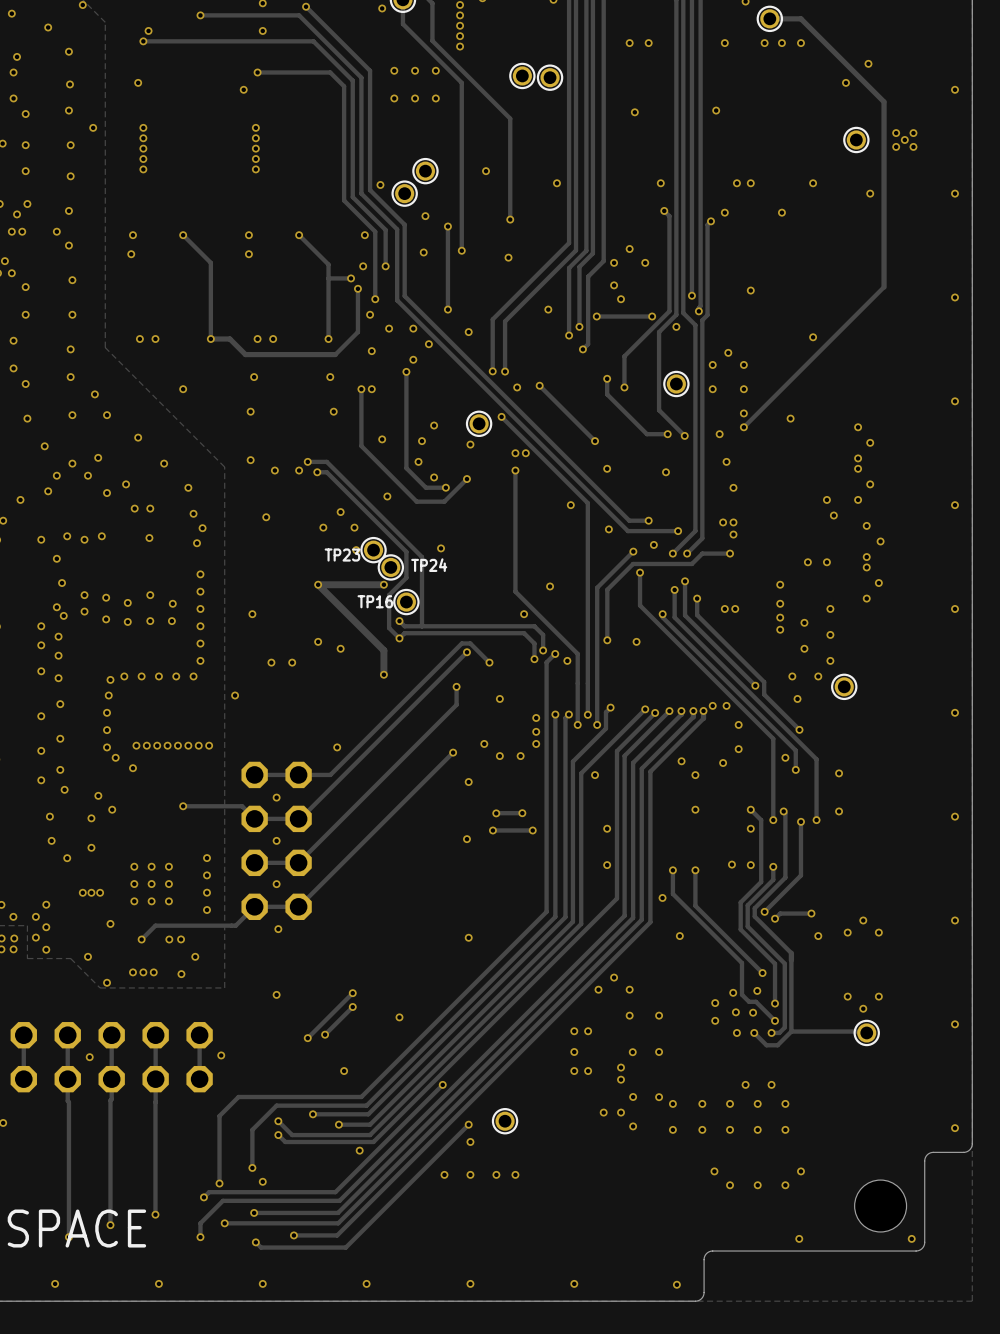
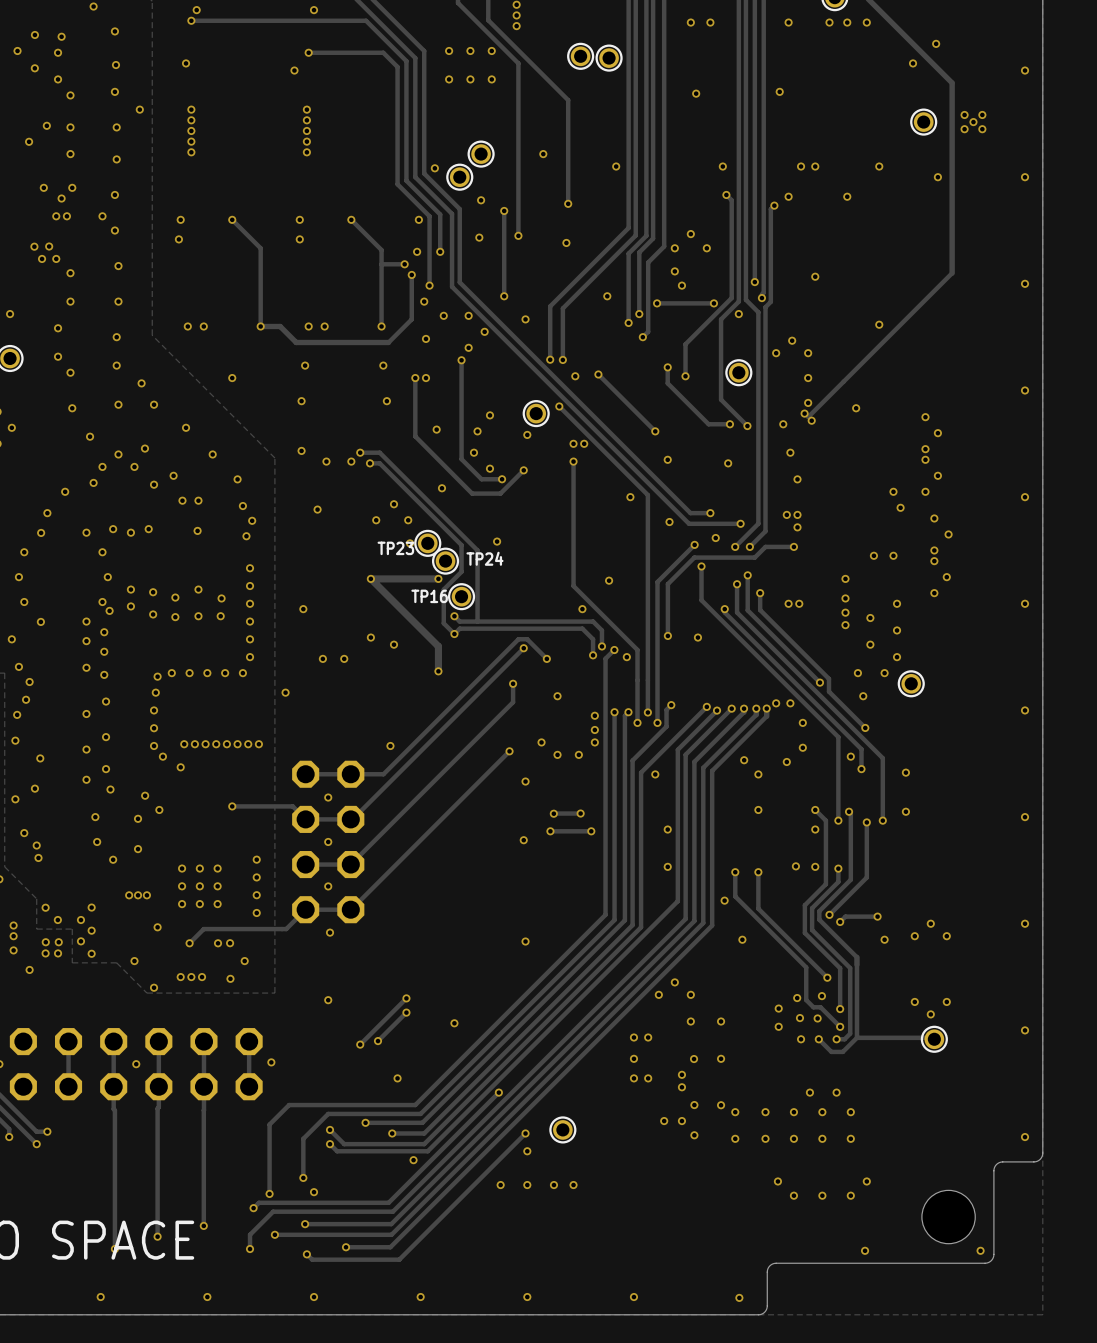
via: (712, 389) -> none
via: none -> (804, 413)
via: (743, 427) -> none
via: none -> (811, 420)

